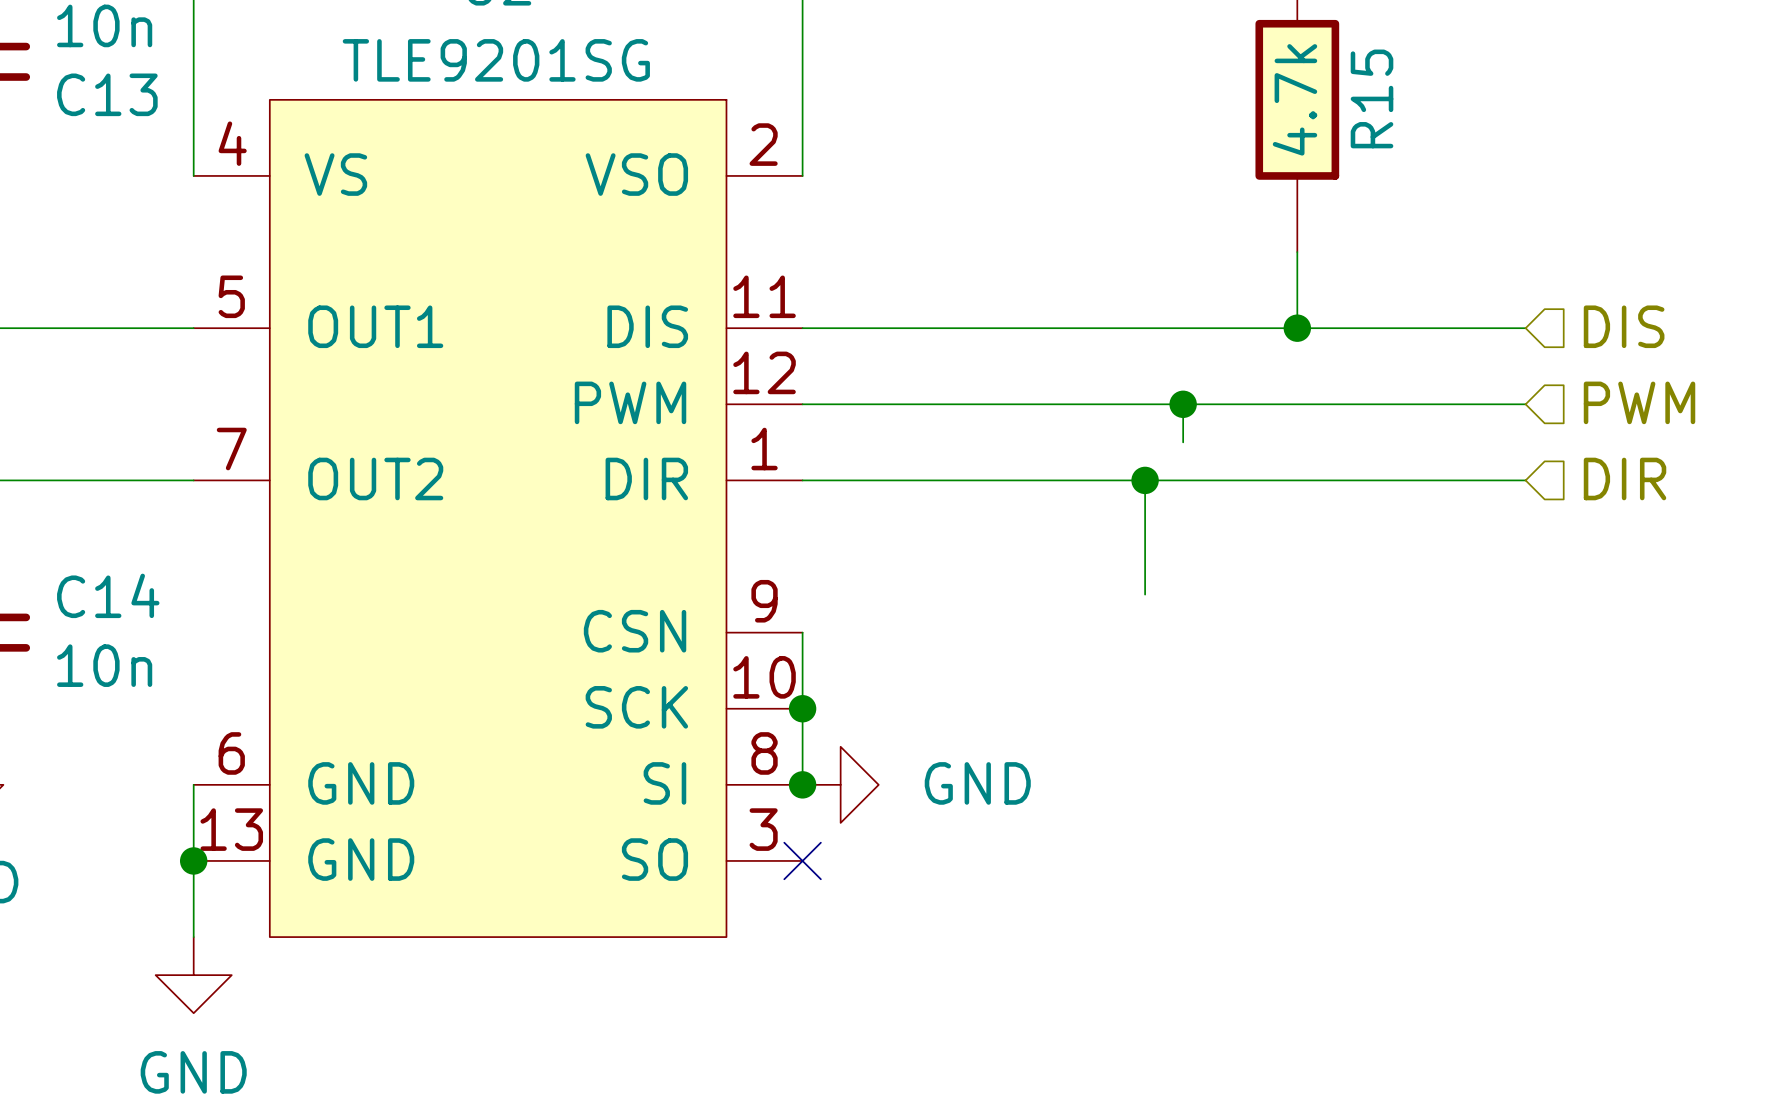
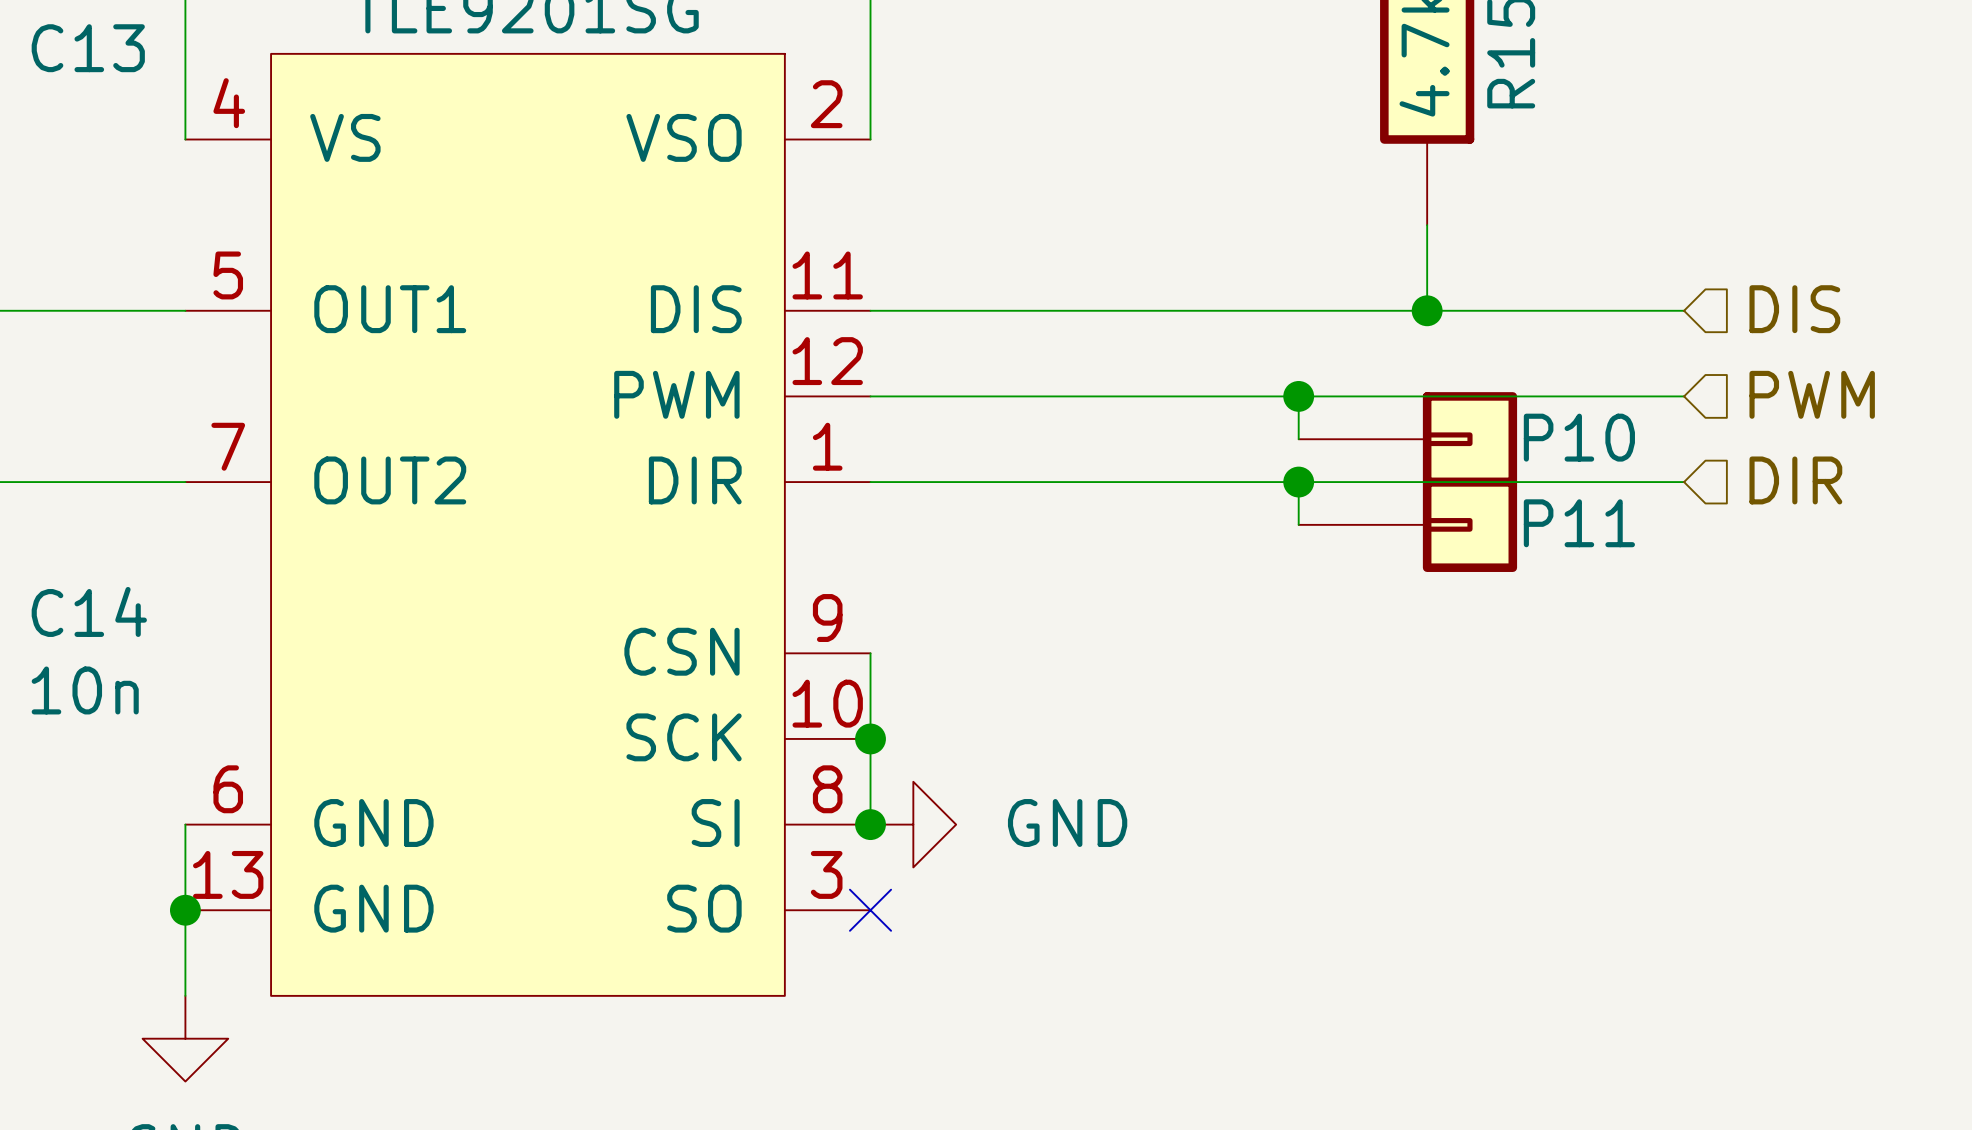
P10: none -> (1407, 439)
wire: (1145, 480) (1145, 594) -> none
junction position: (1145, 480) -> (1298, 482)
wire: none -> (1298, 482) (1298, 524)
P11: none -> (1407, 524)

